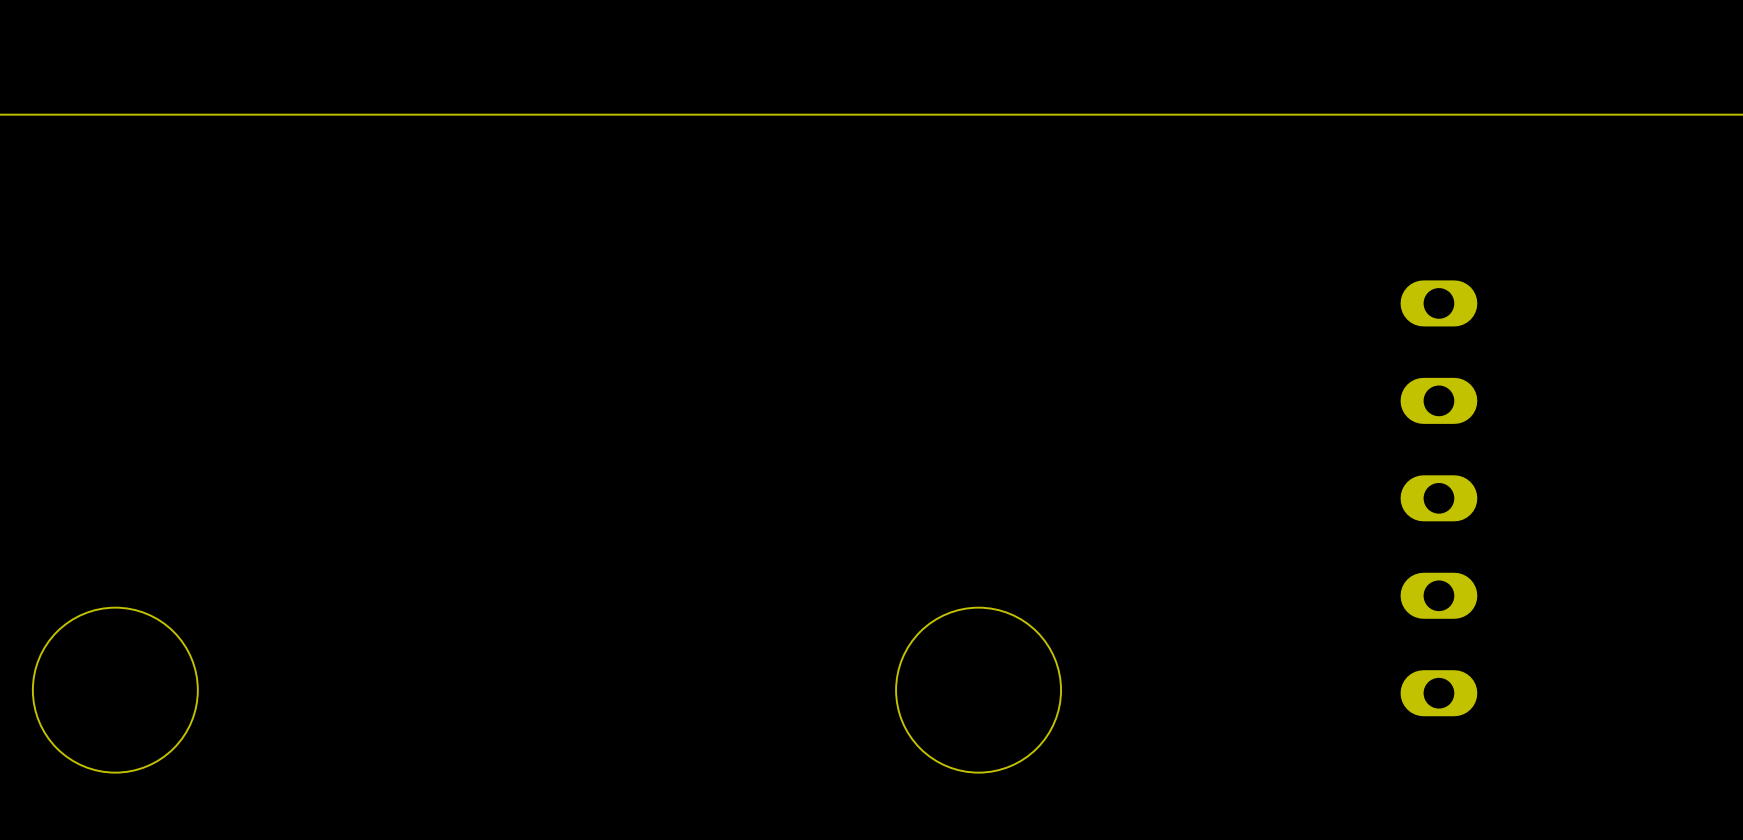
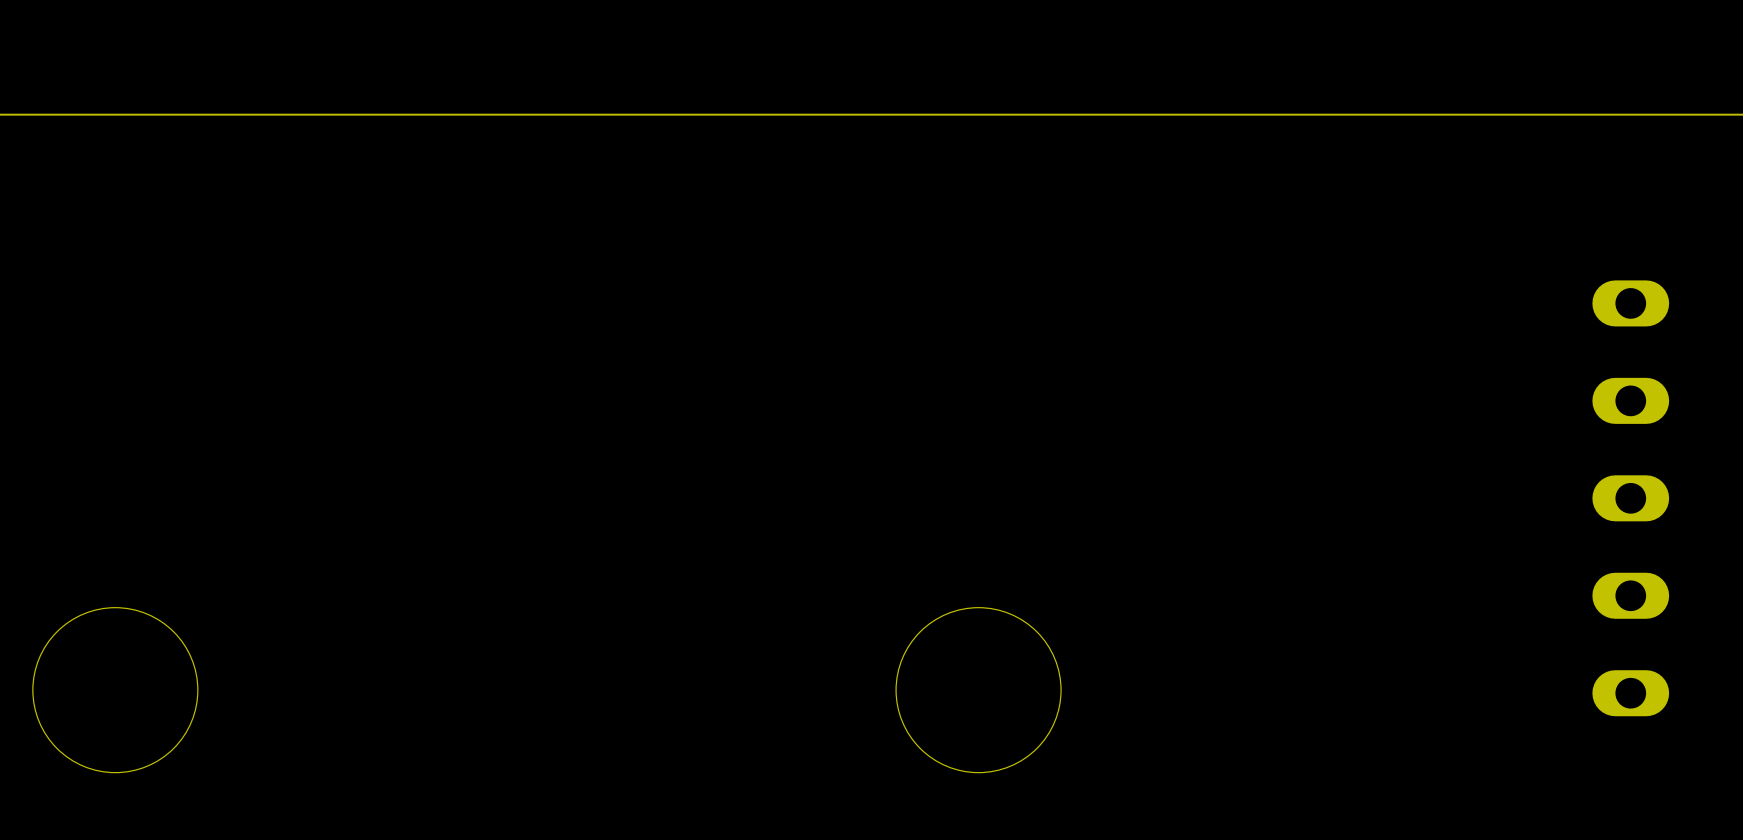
part position: (1438, 498) -> (1630, 498)

